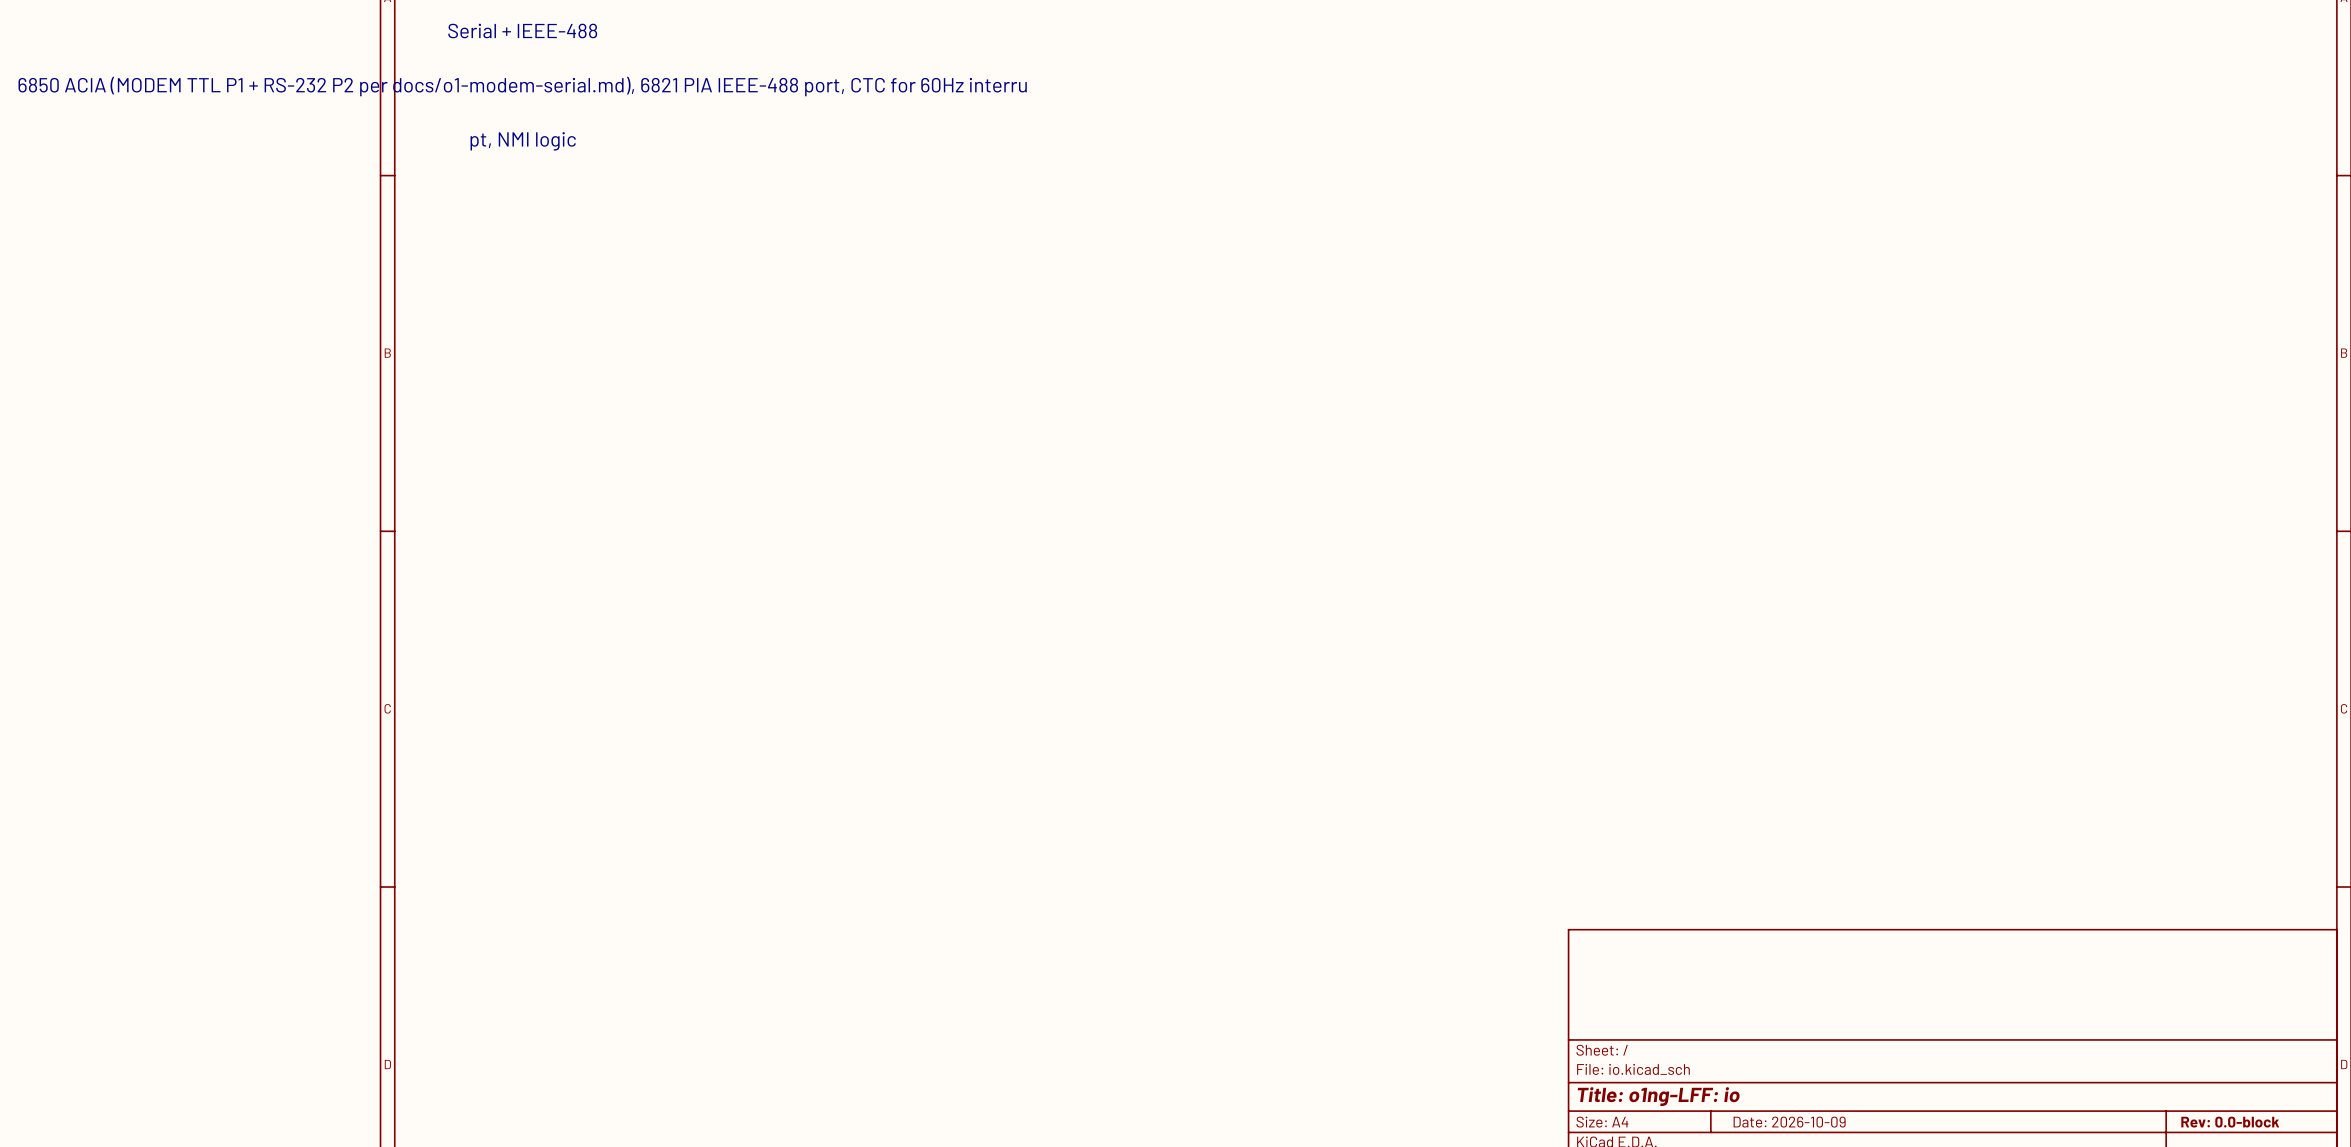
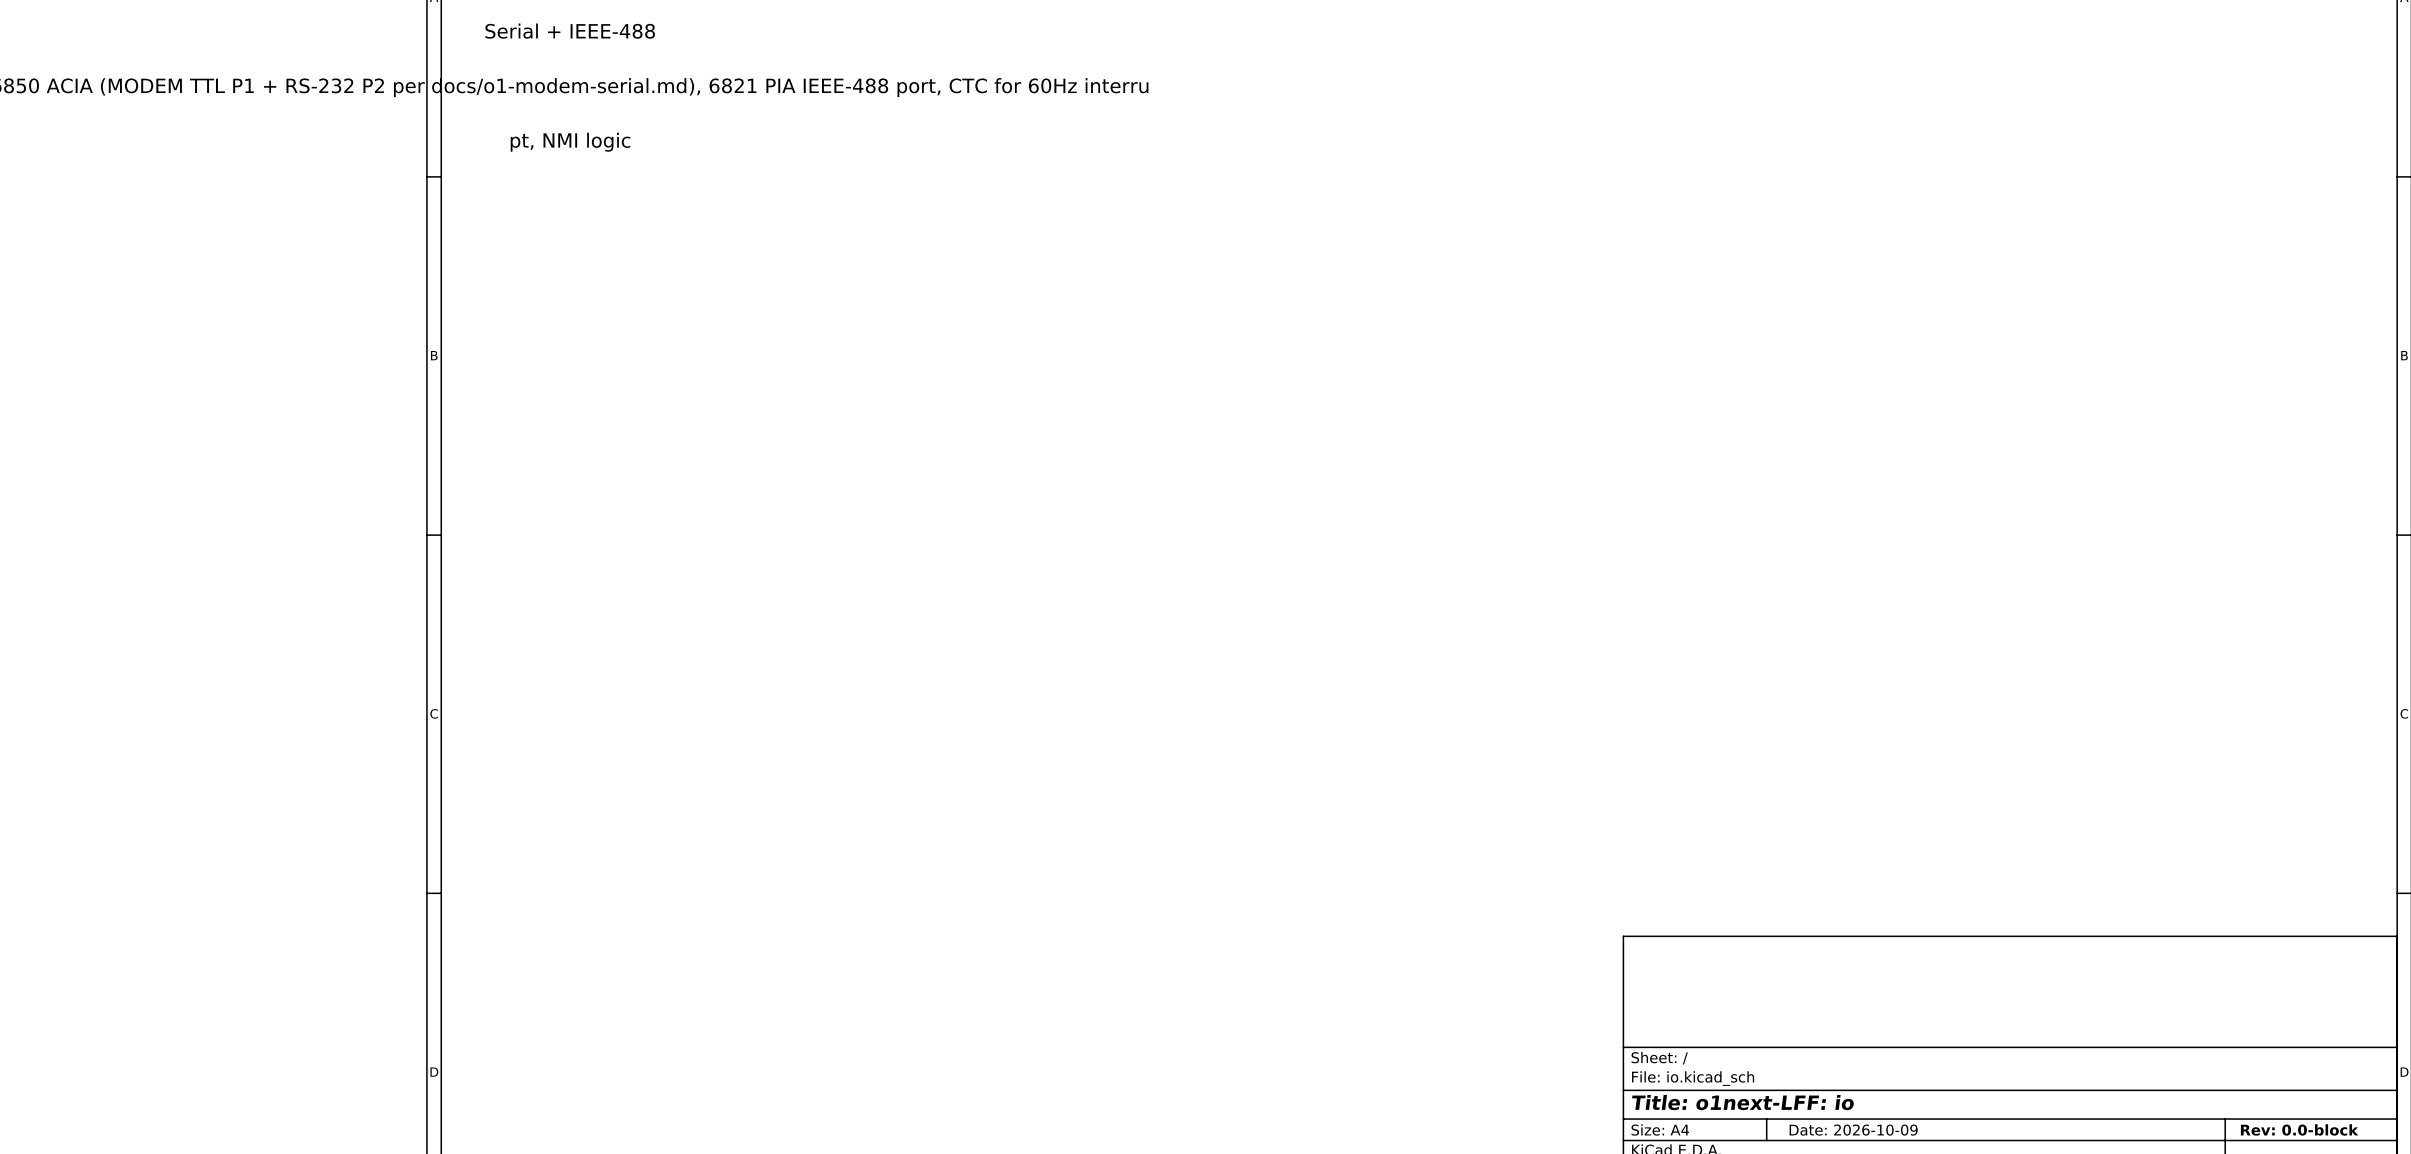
title block: Title: o1ng-LFF: io (1658, 1096) -> Title: o1next-LFF: io (1743, 1102)

